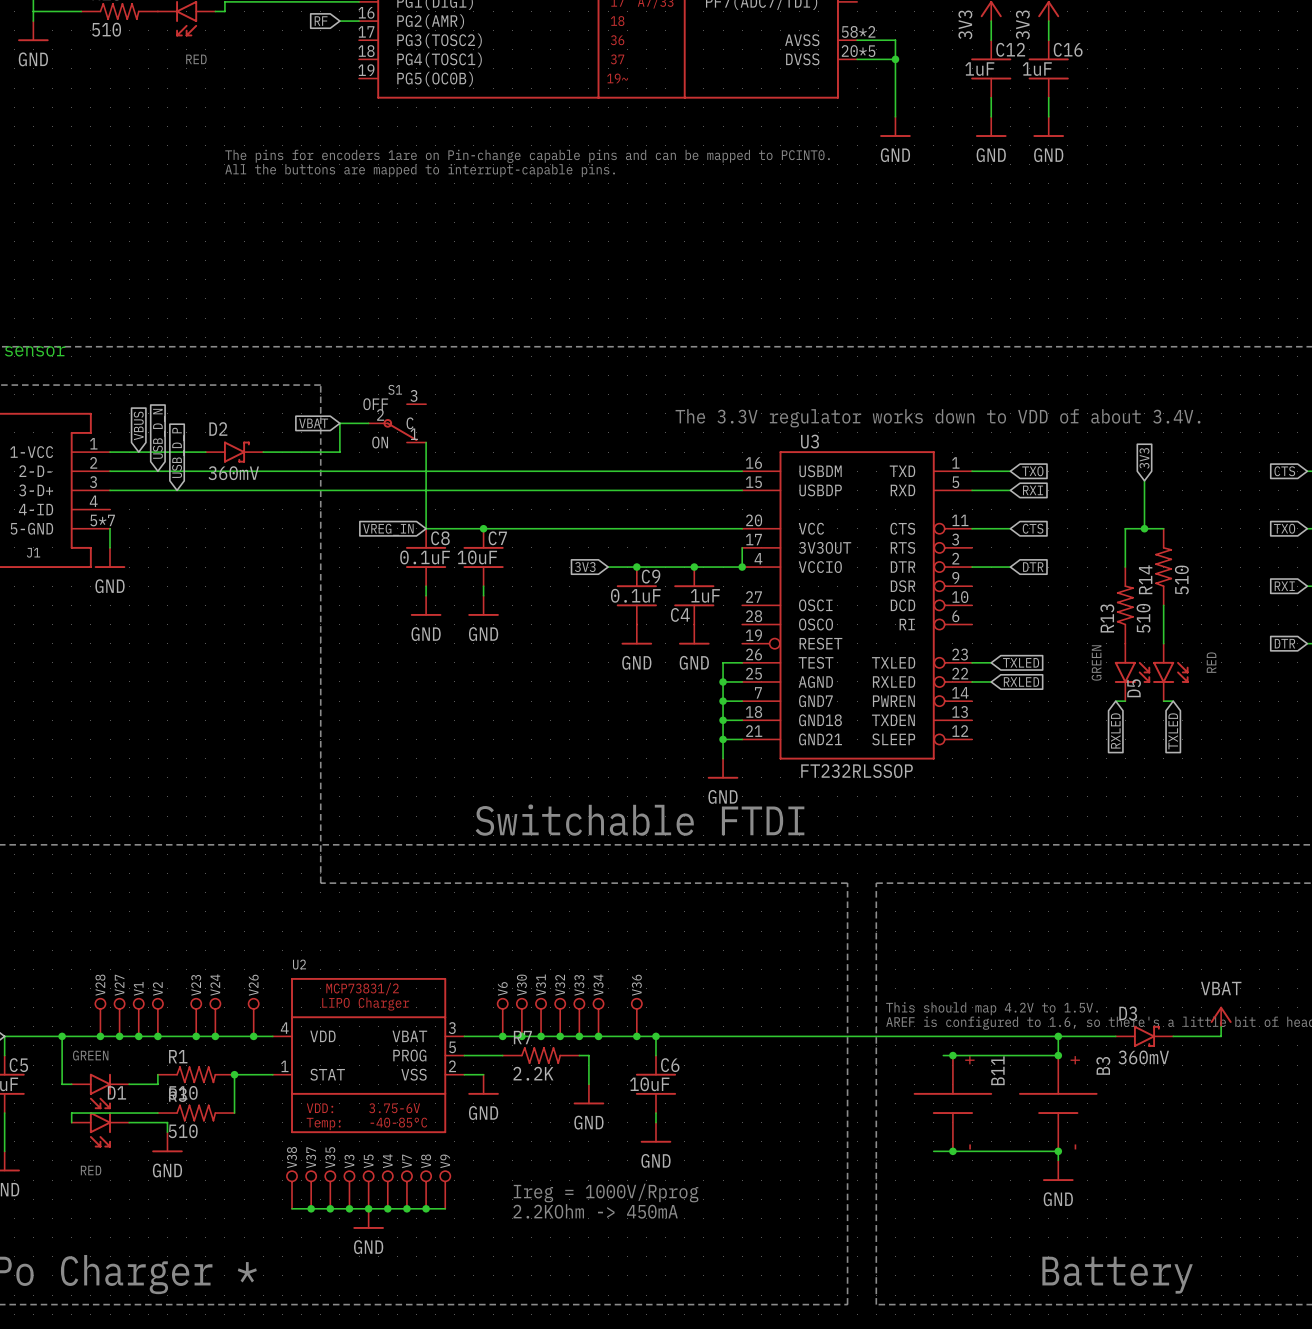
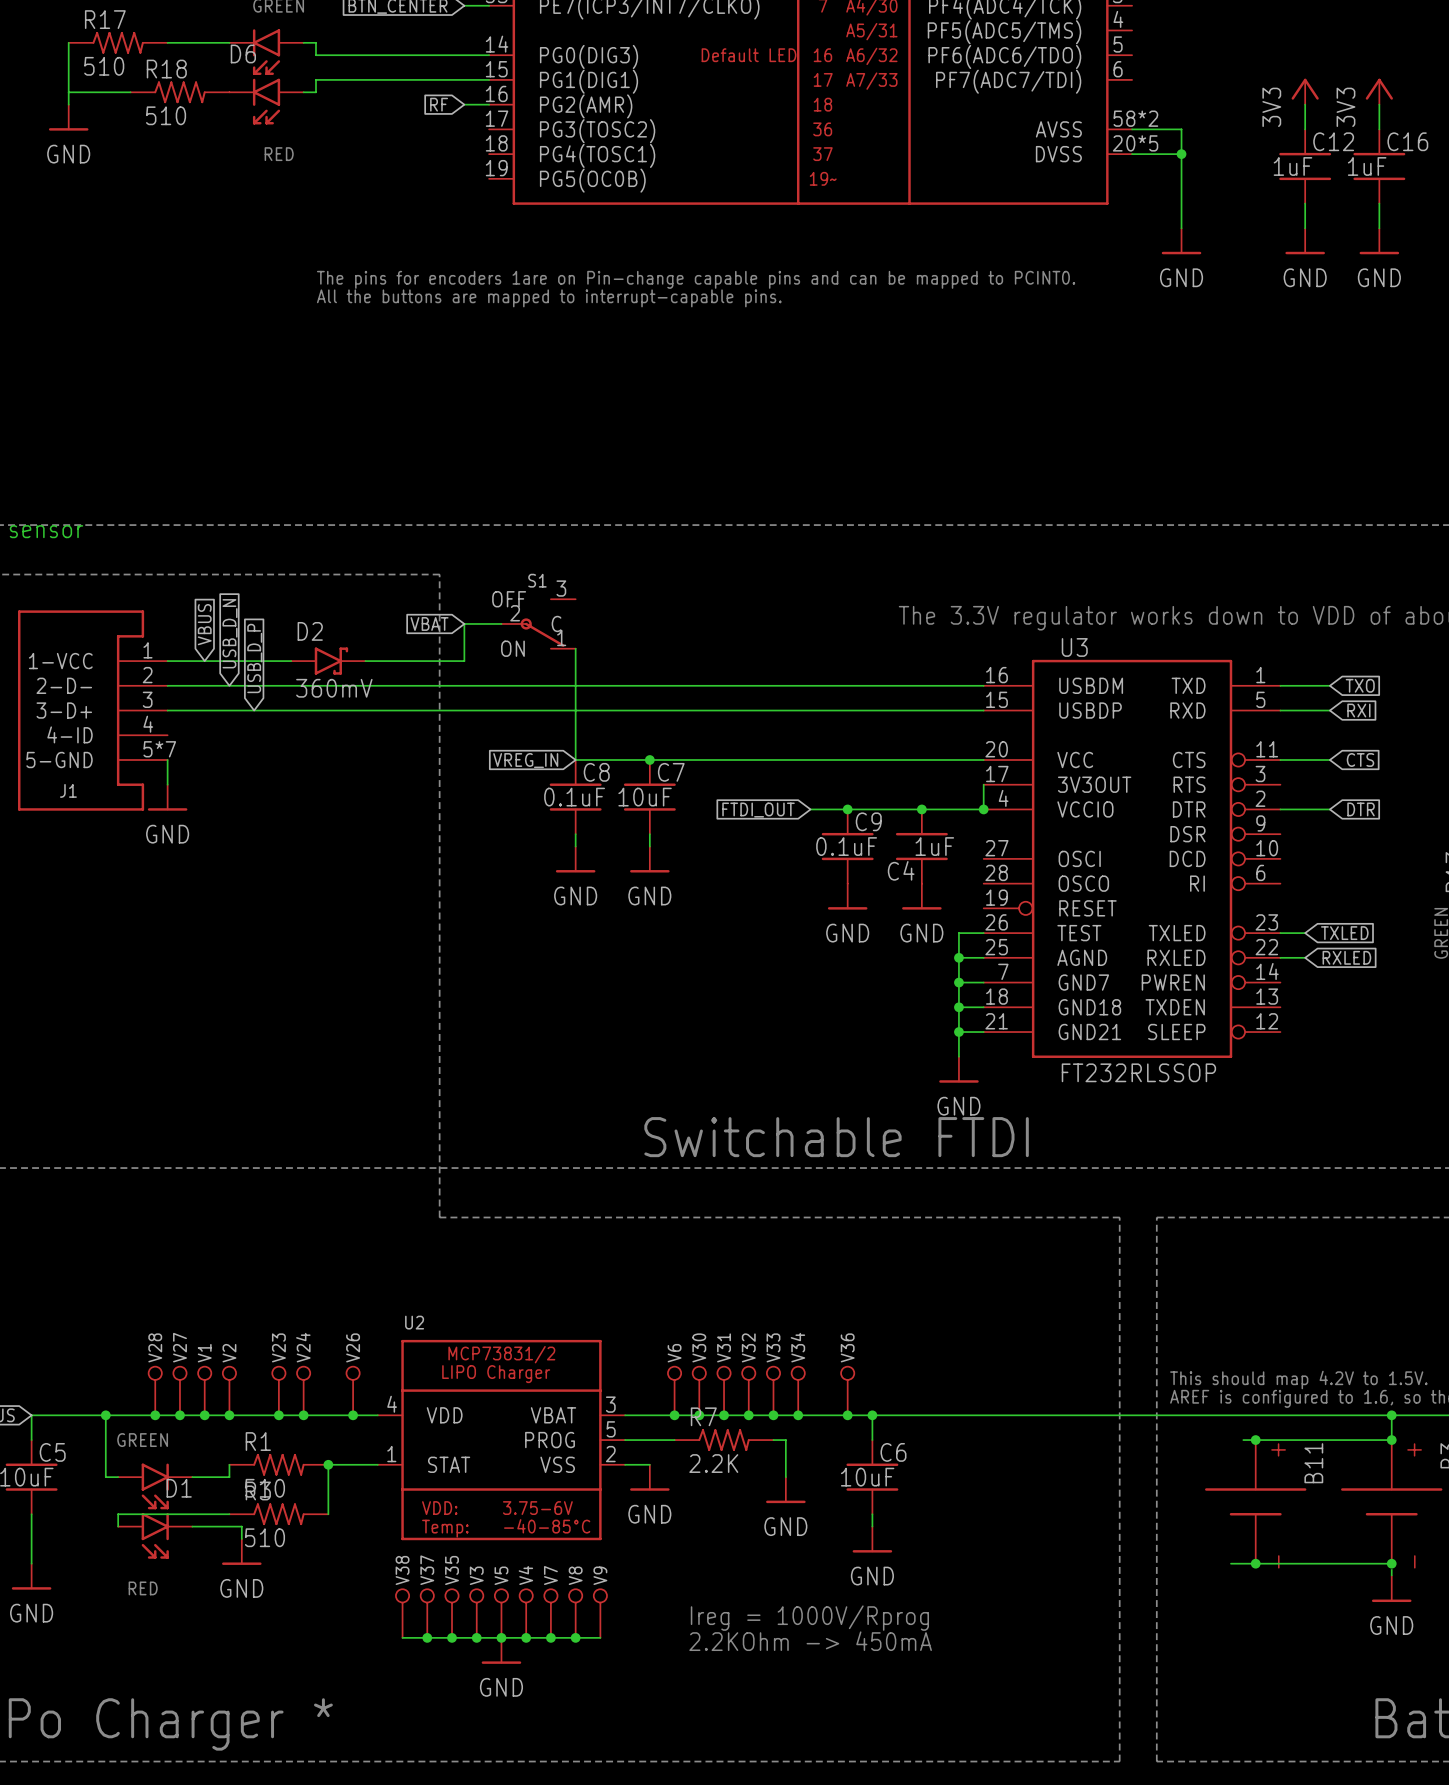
global label: 3V3 (585, 567) -> FTDI_OUT (758, 810)

